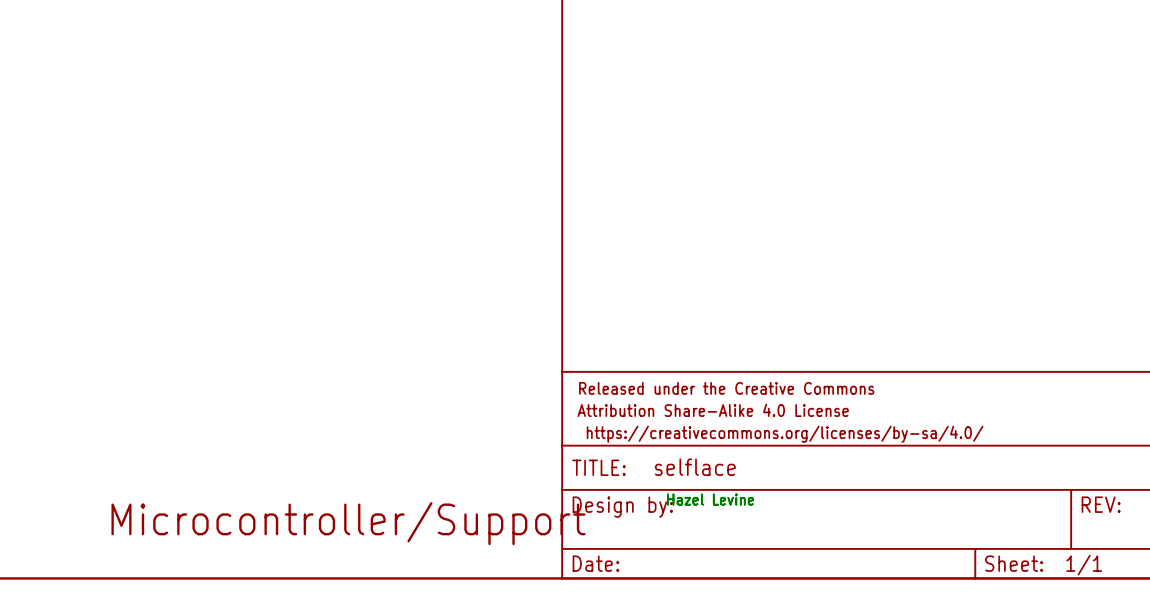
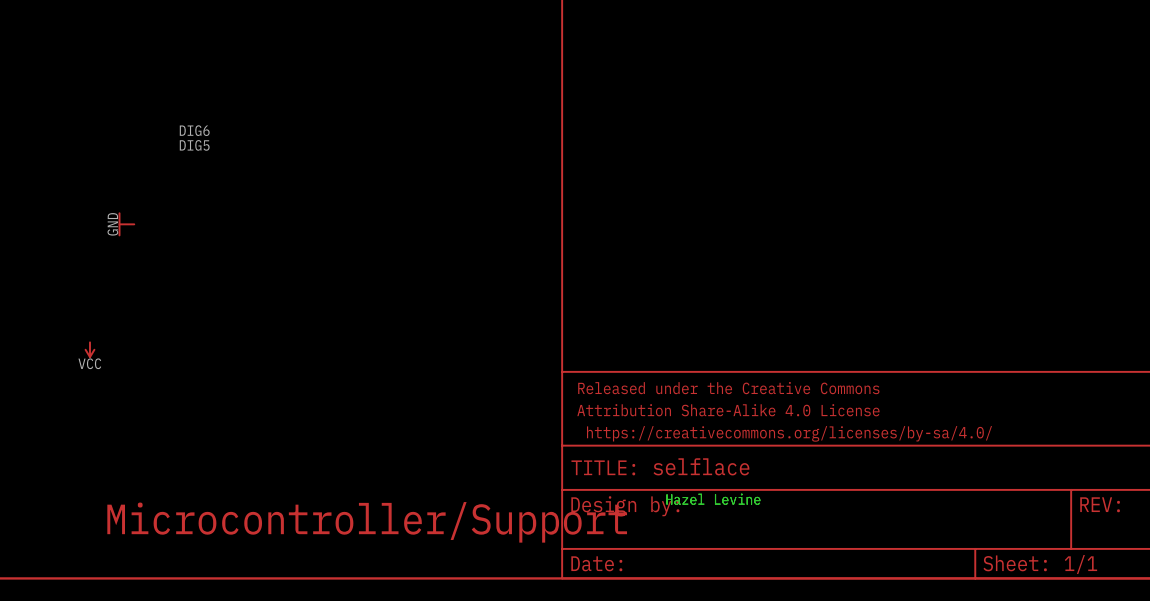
label: none -> DIG6 (194, 130)
label: none -> DIG5 (194, 145)
power symbol: none -> GND (126, 224)
power symbol: none -> VCC (90, 350)

